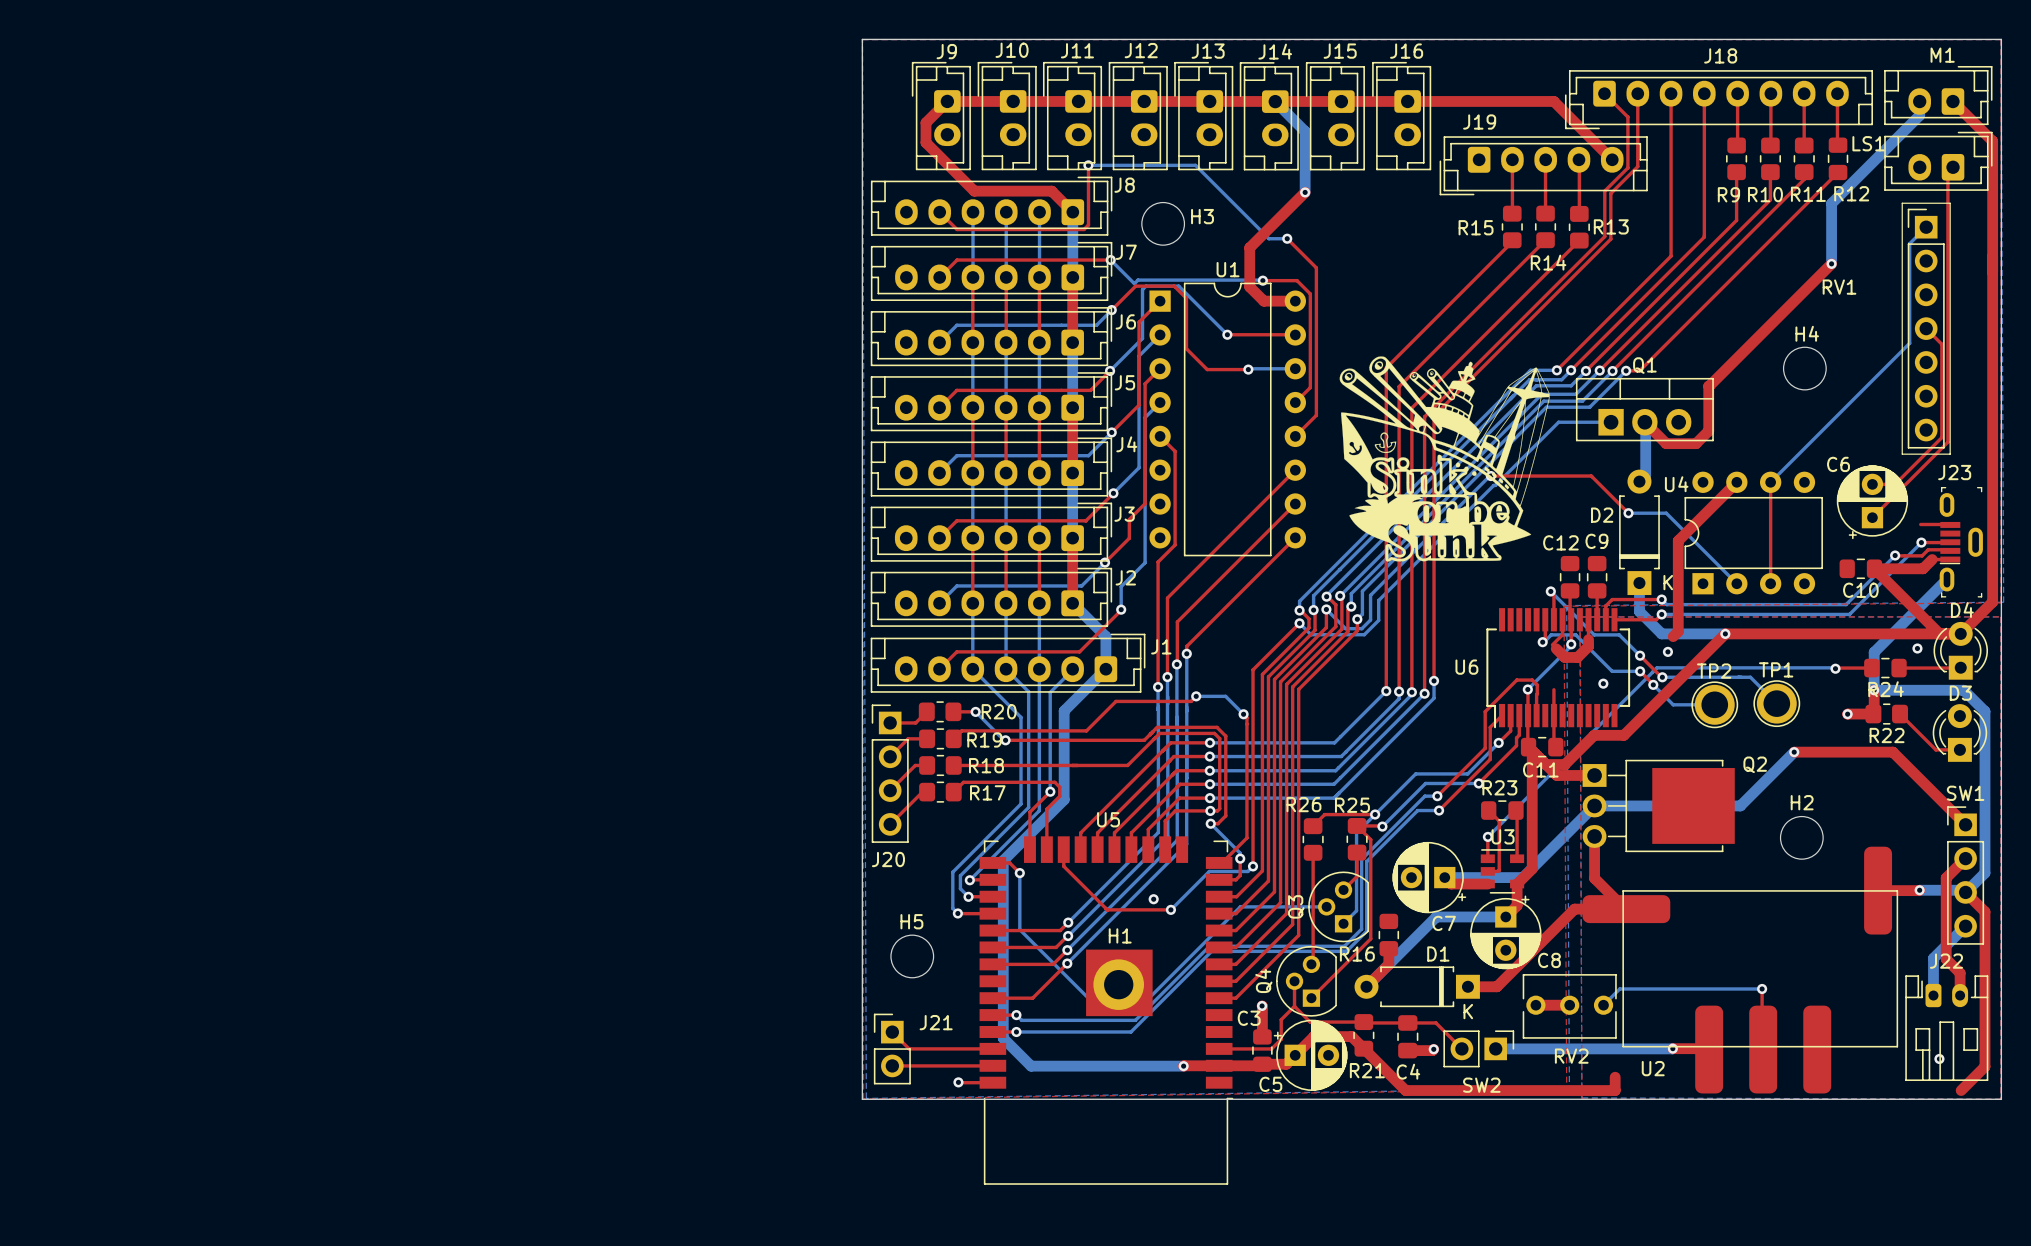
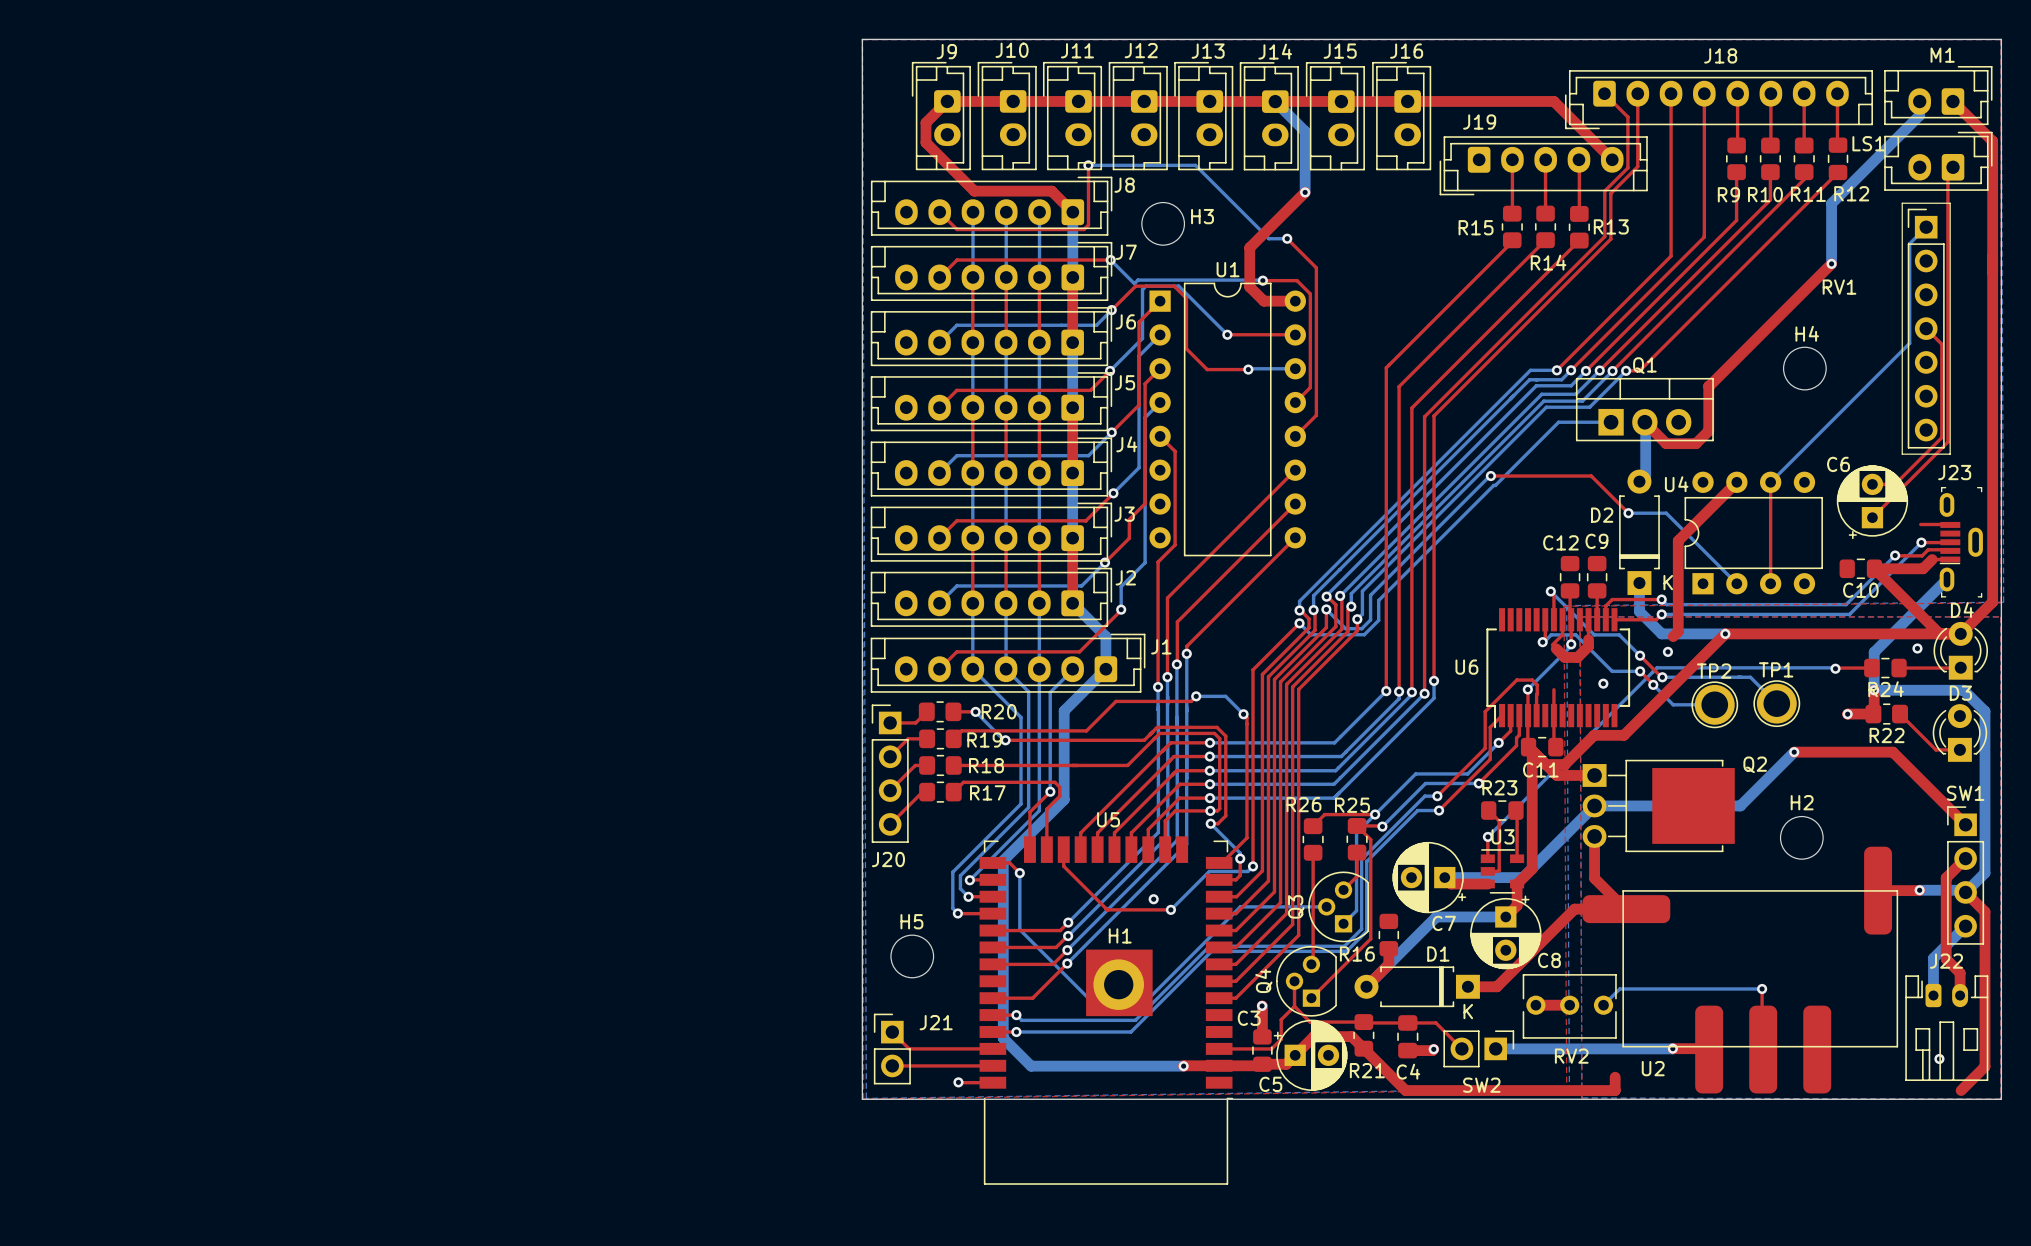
drawing: [1339, 356, 1550, 562] -> none

